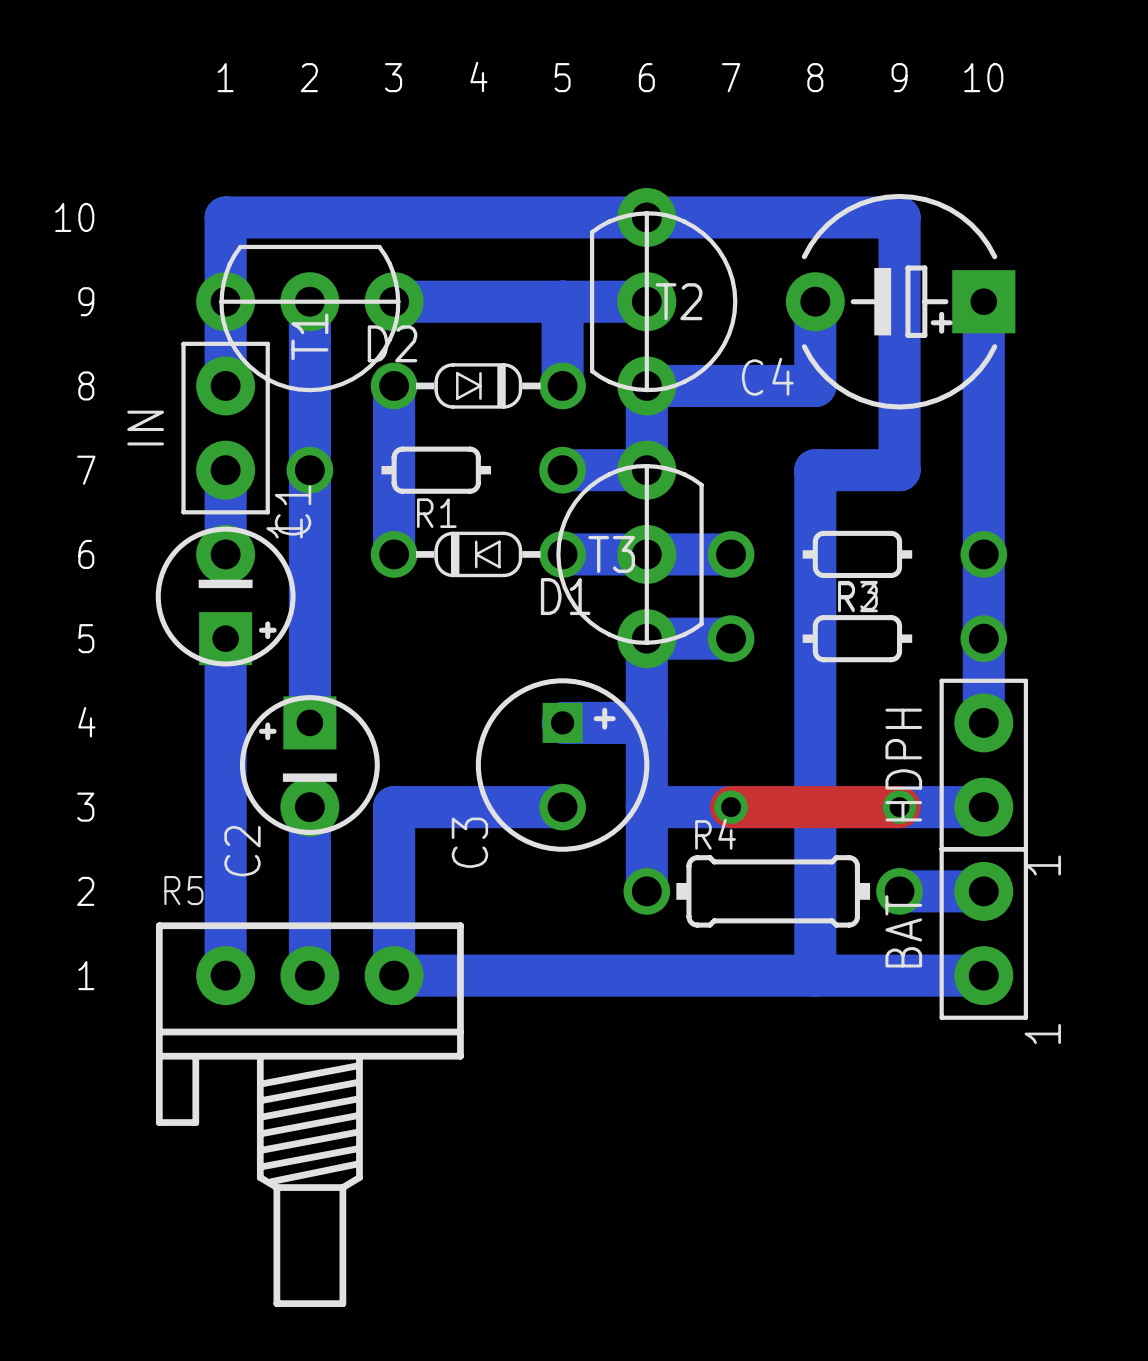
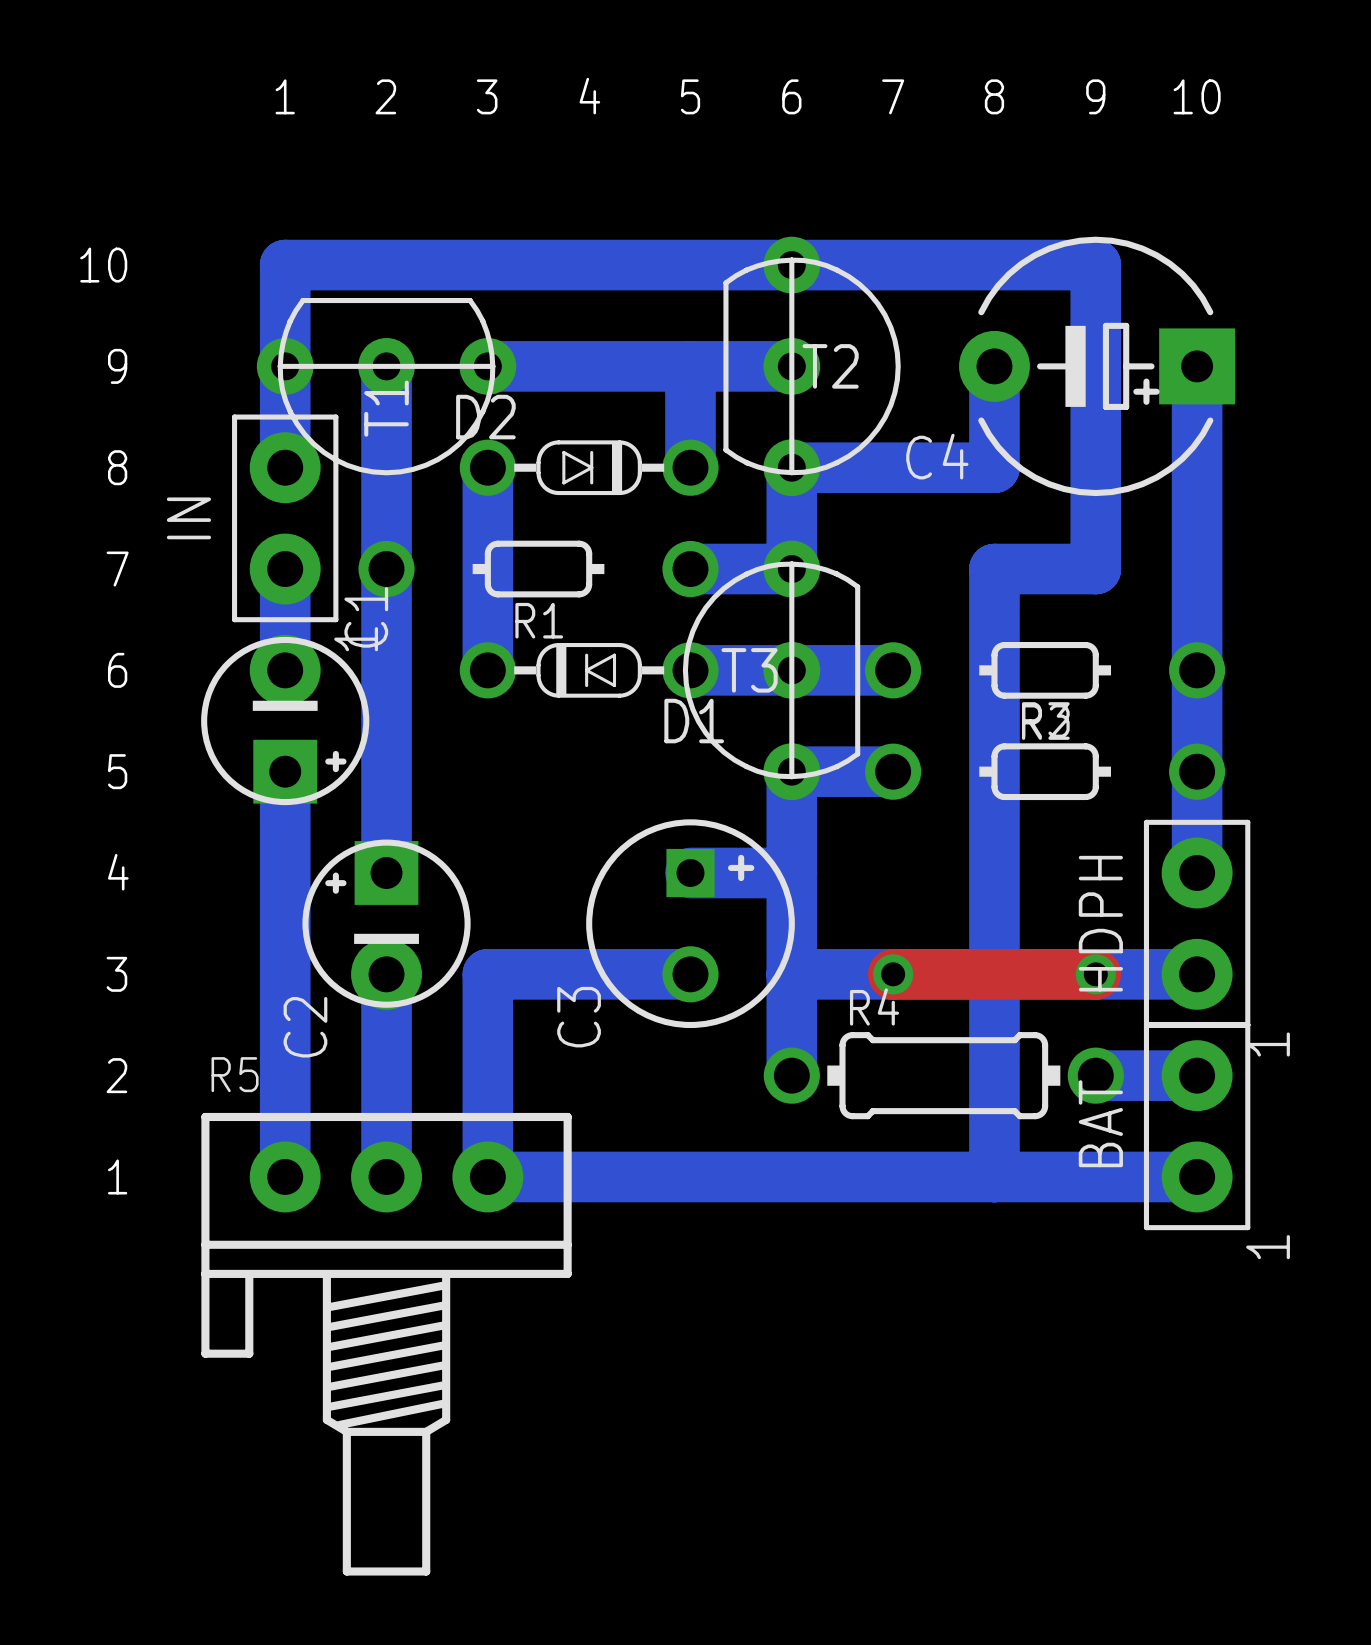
T2 footprint: [589, 187, 738, 416] -> [723, 236, 901, 497]
T1 footprint: [196, 244, 424, 393] -> [256, 297, 517, 476]
T3 footprint: [556, 440, 704, 669] -> [682, 540, 861, 801]

